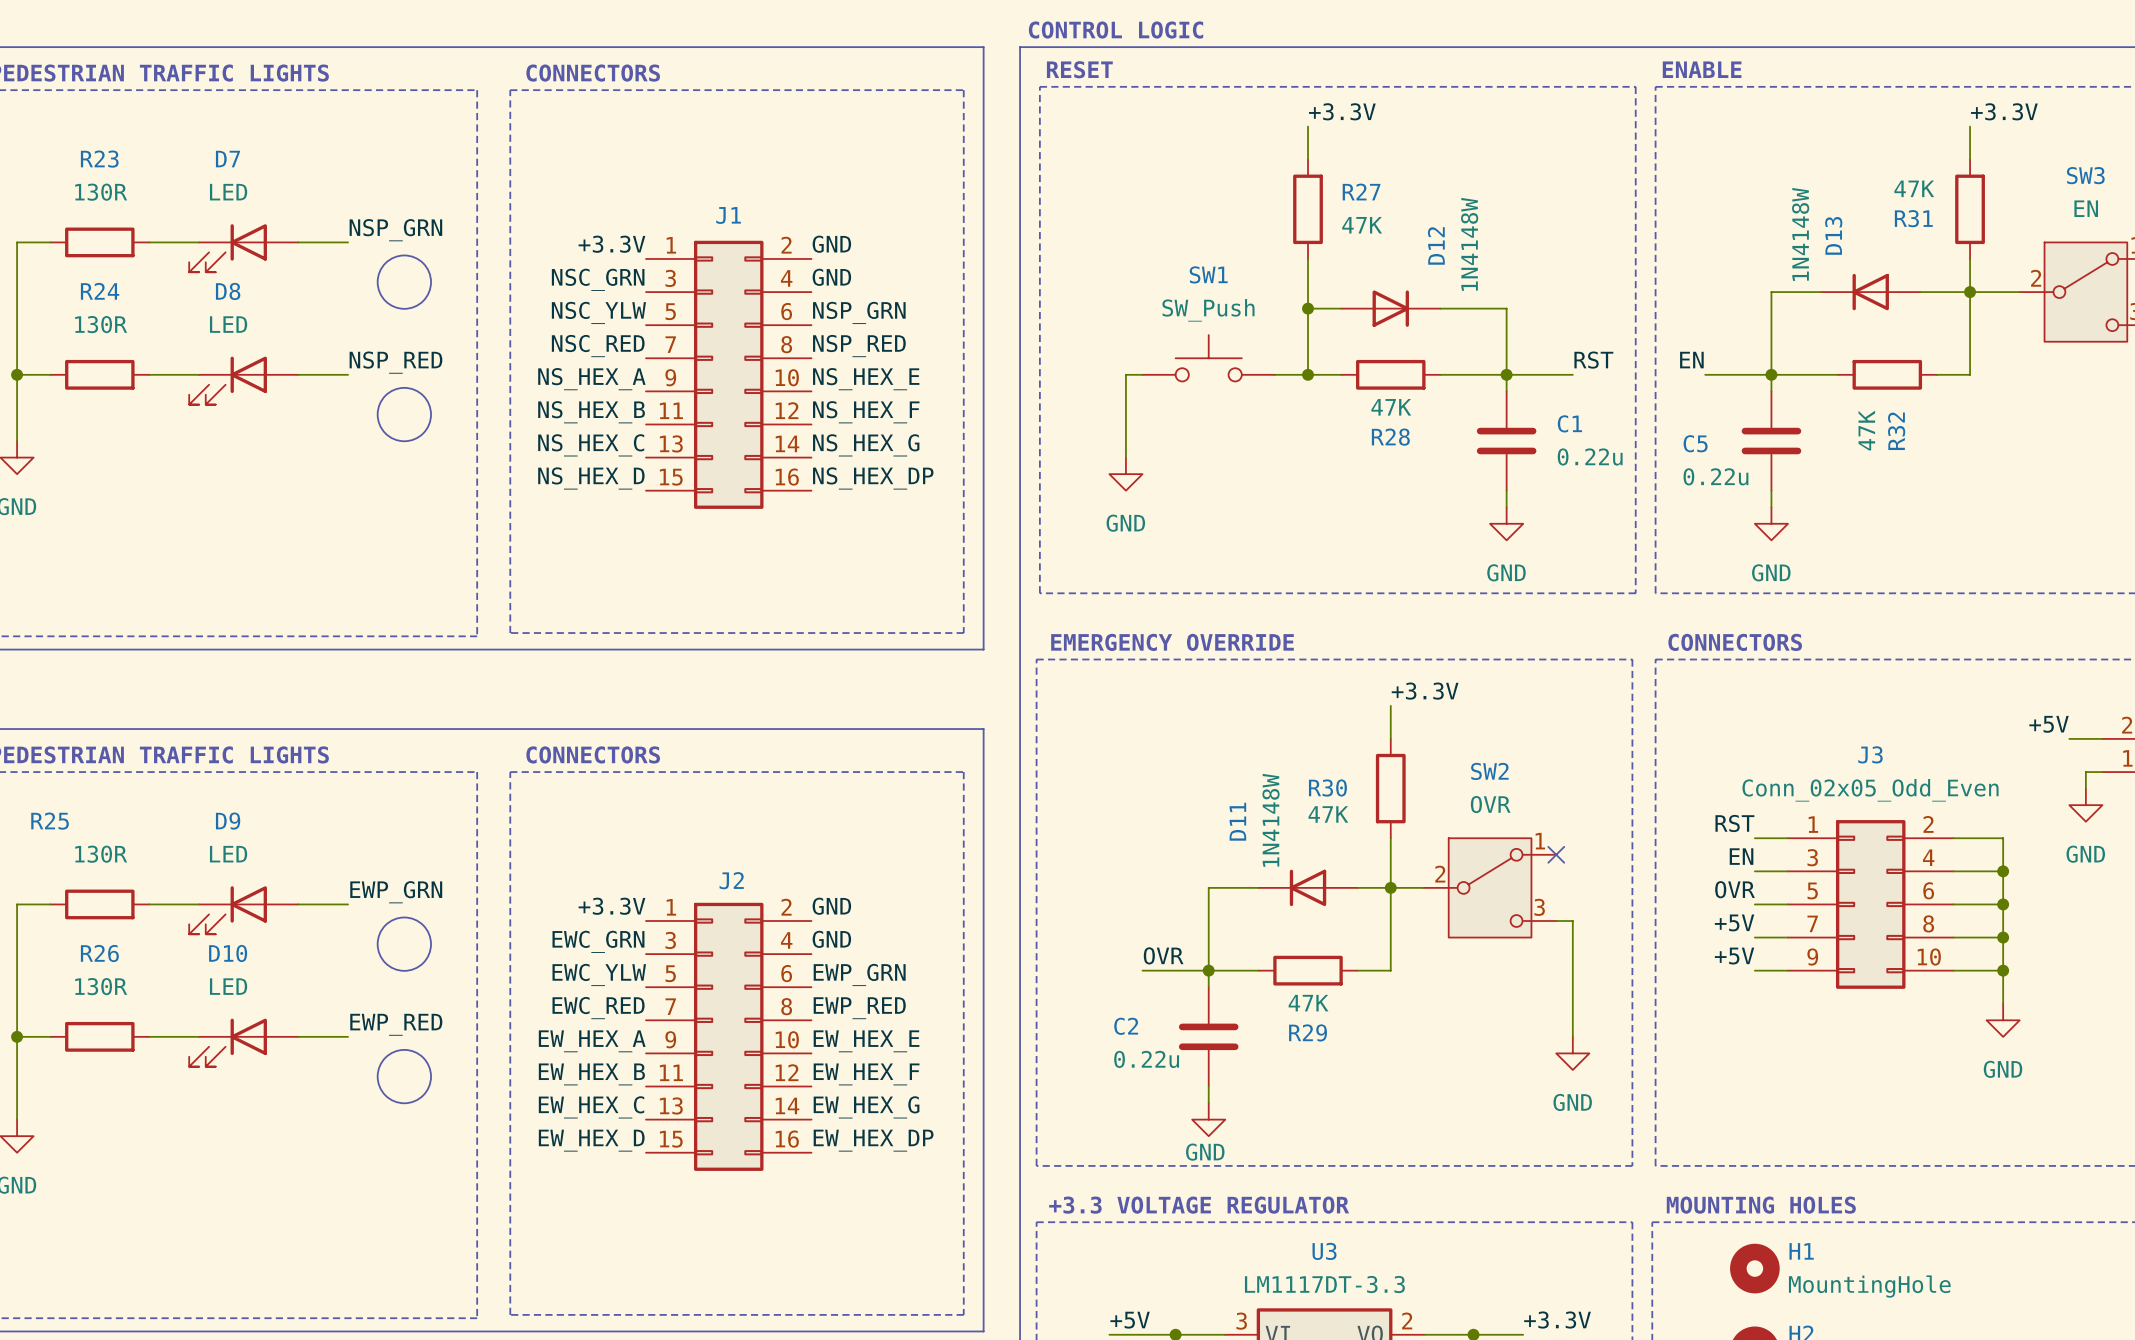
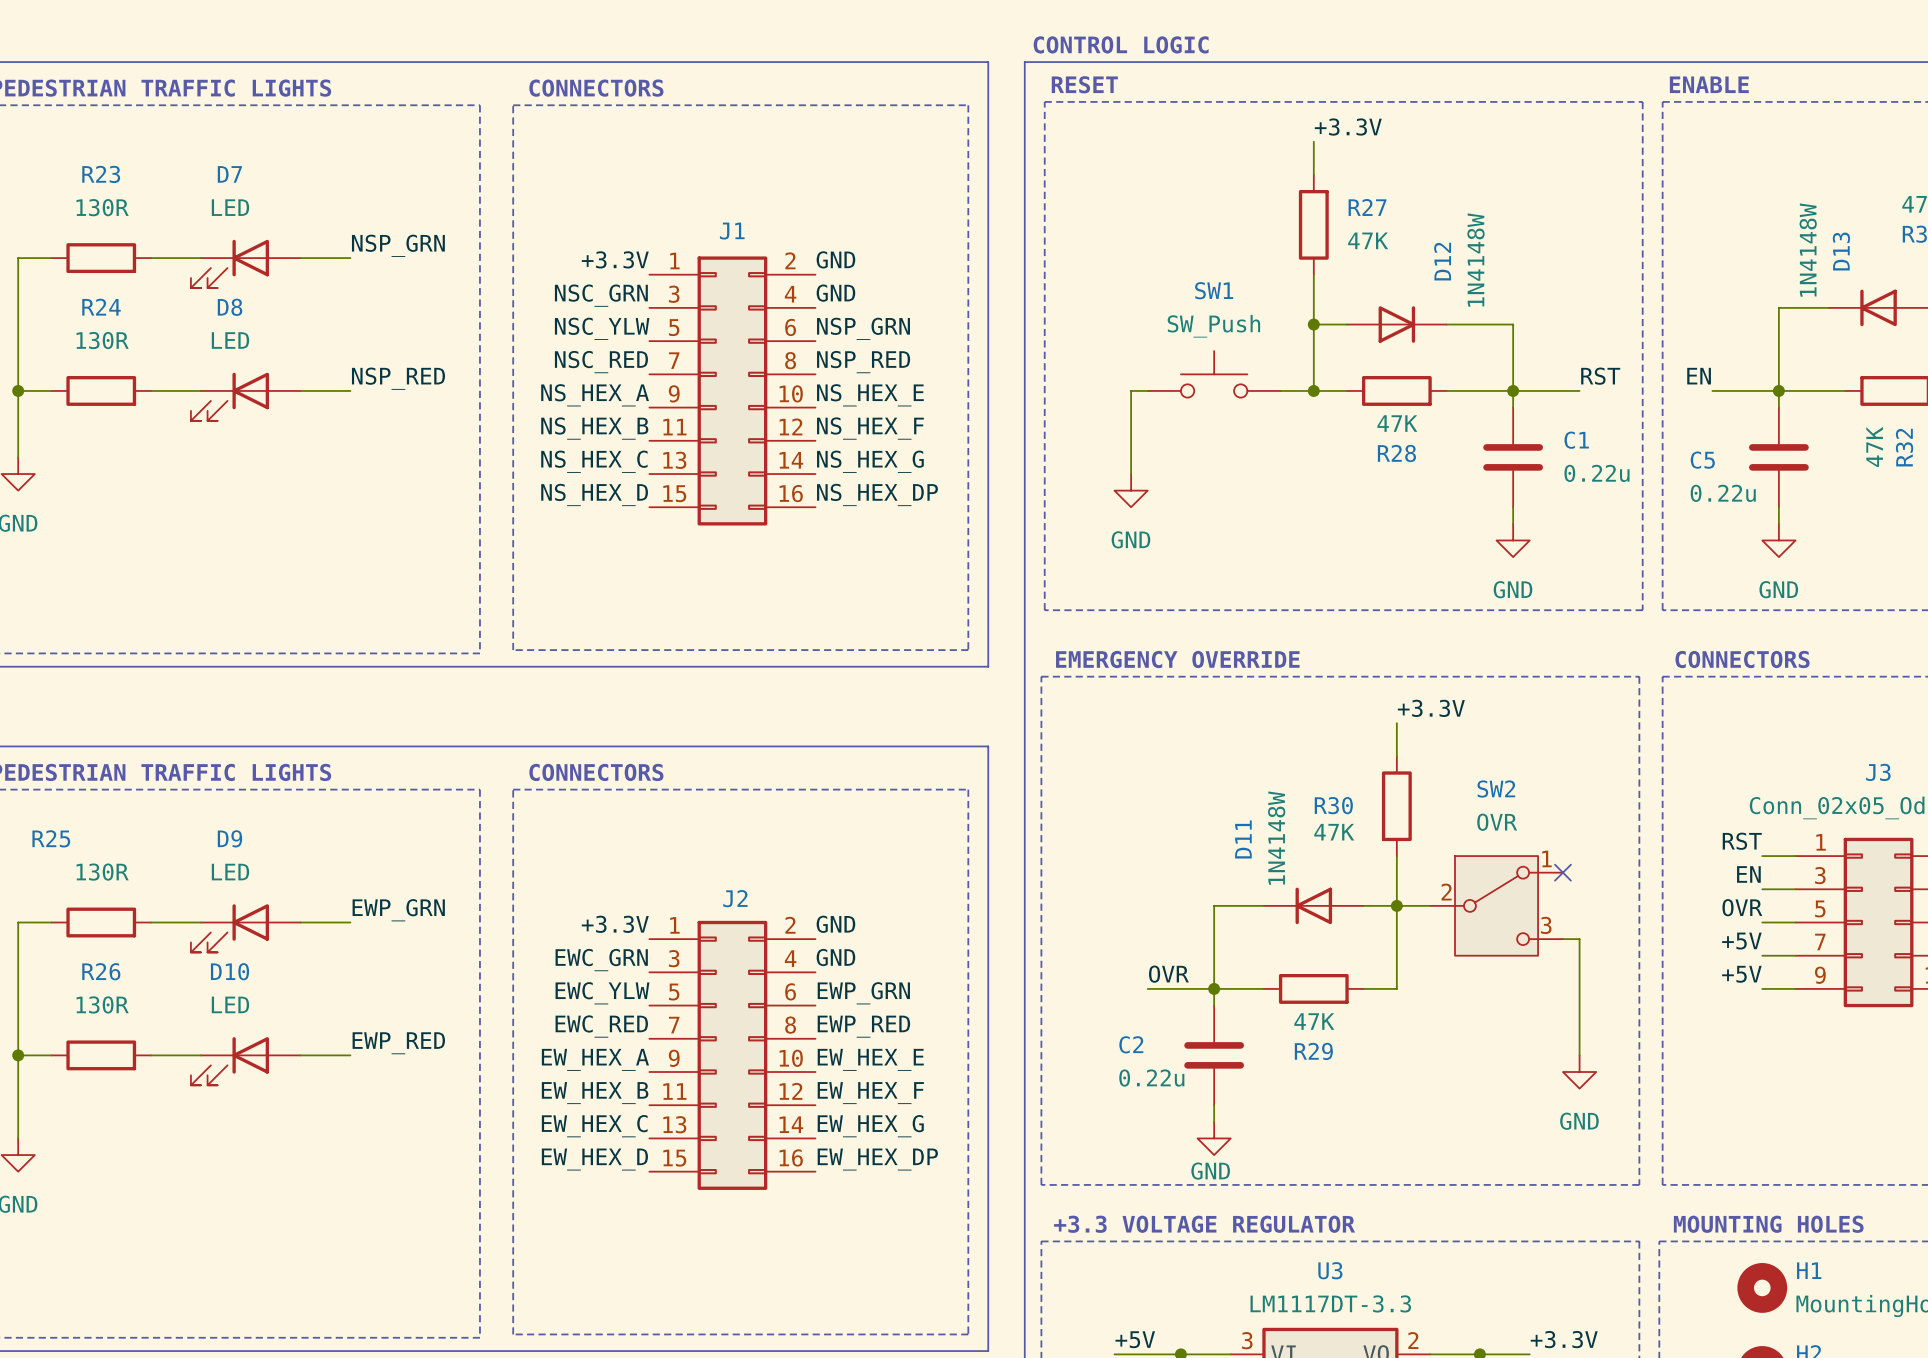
drawing: [377, 255, 432, 309] -> none
drawing: [377, 387, 432, 442] -> none
drawing: [377, 917, 432, 971] -> none
drawing: [377, 1049, 432, 1104] -> none

